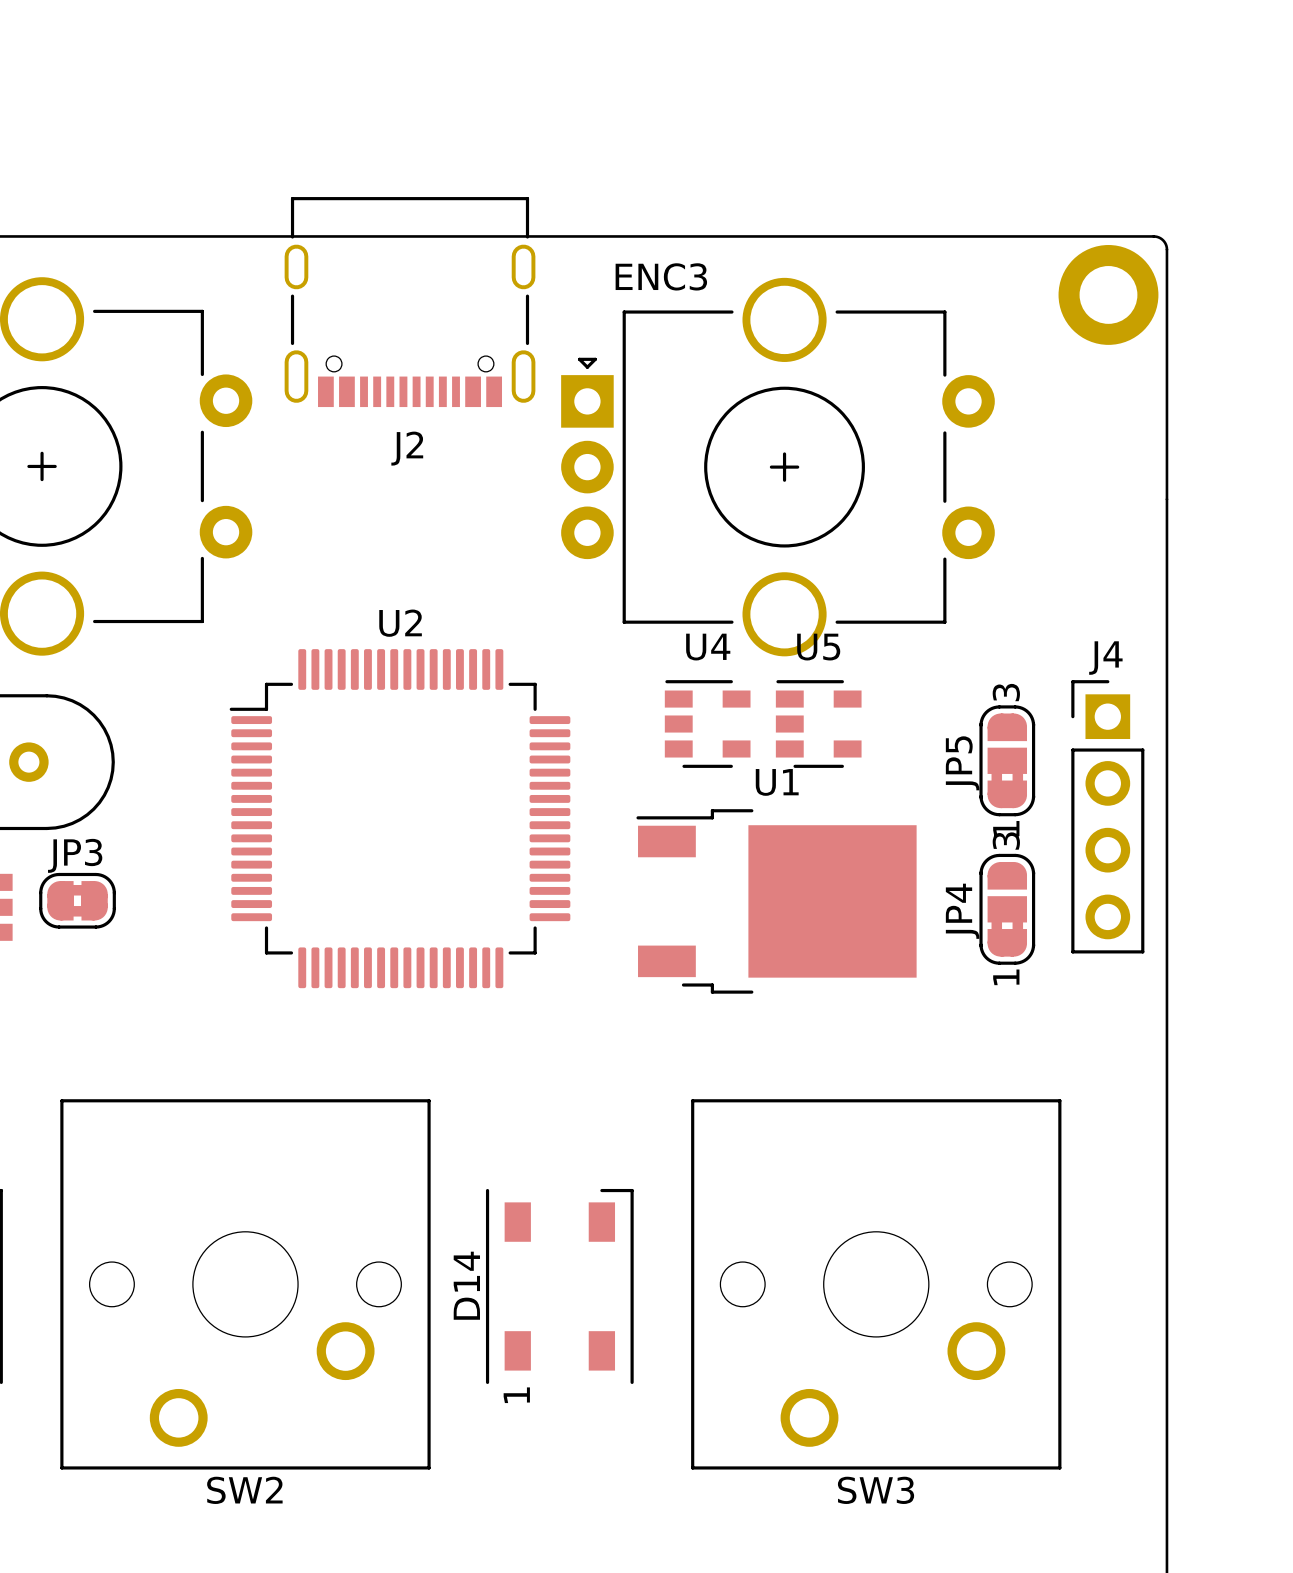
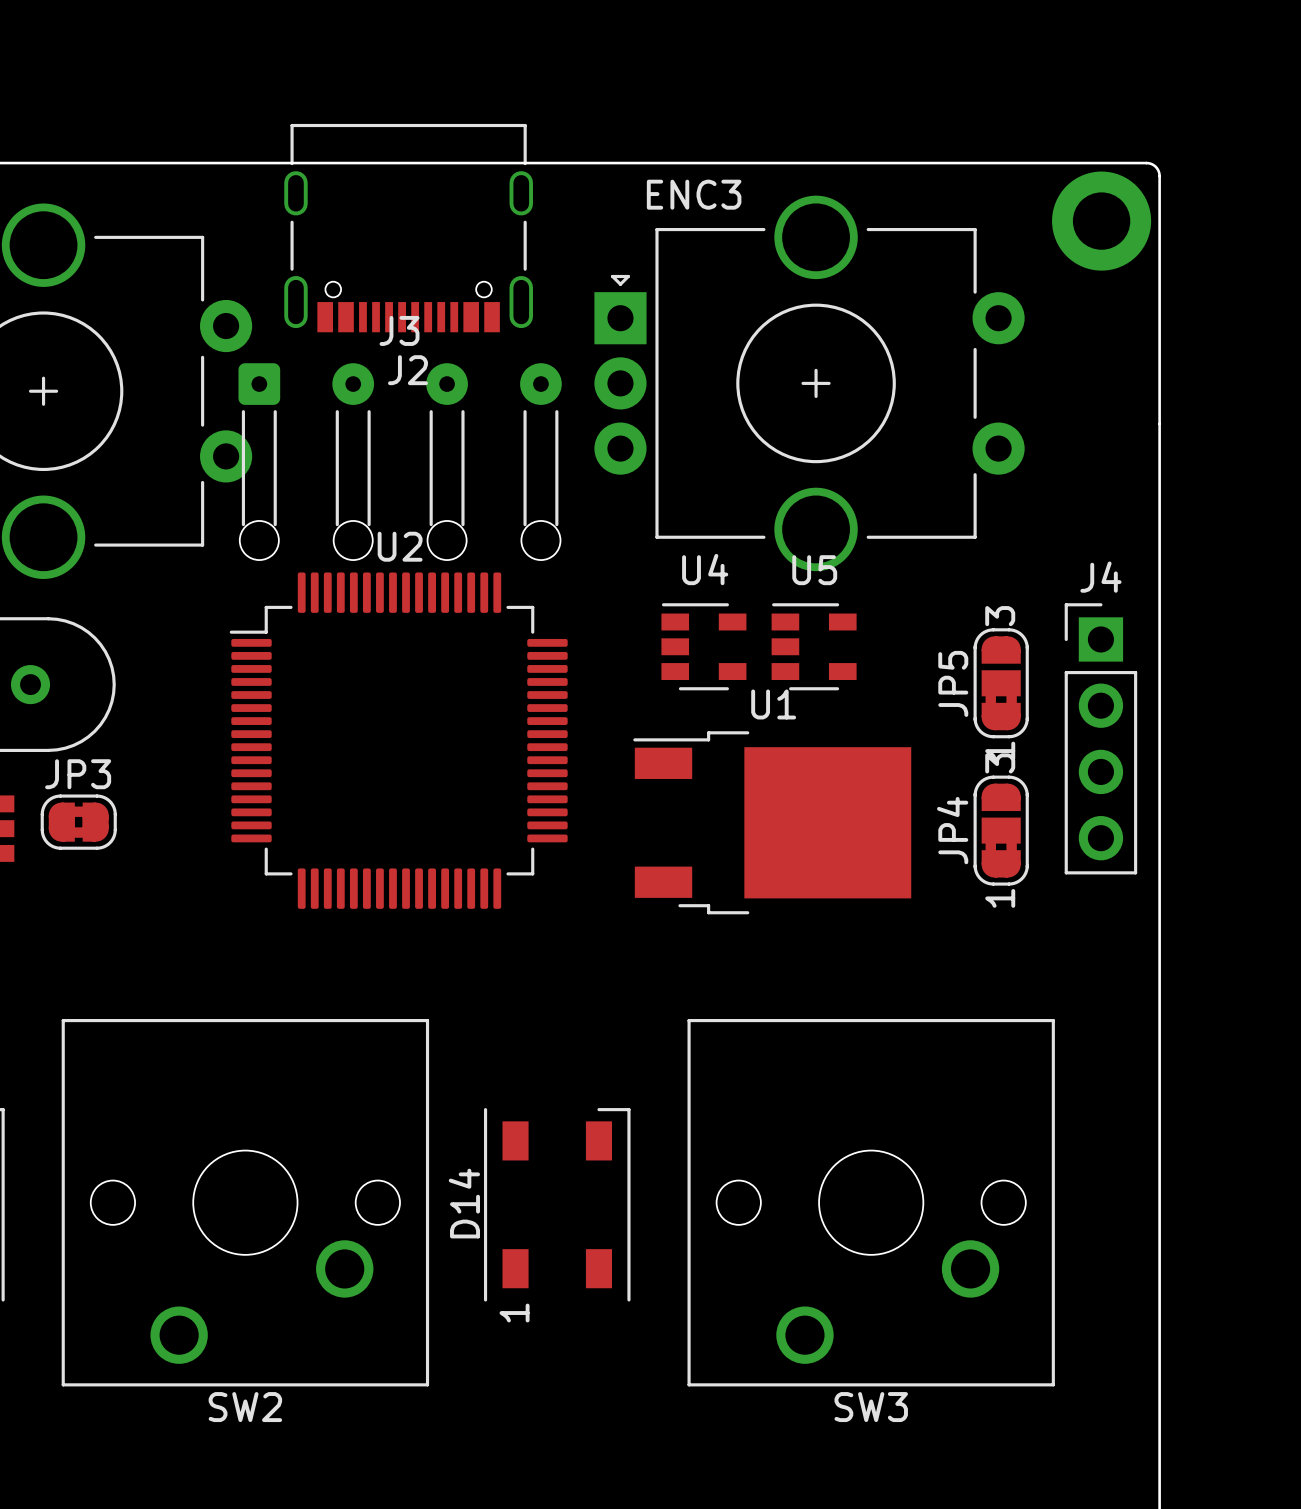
ENC3 position: (777, 467) -> (809, 383)
J3: none -> (400, 461)

